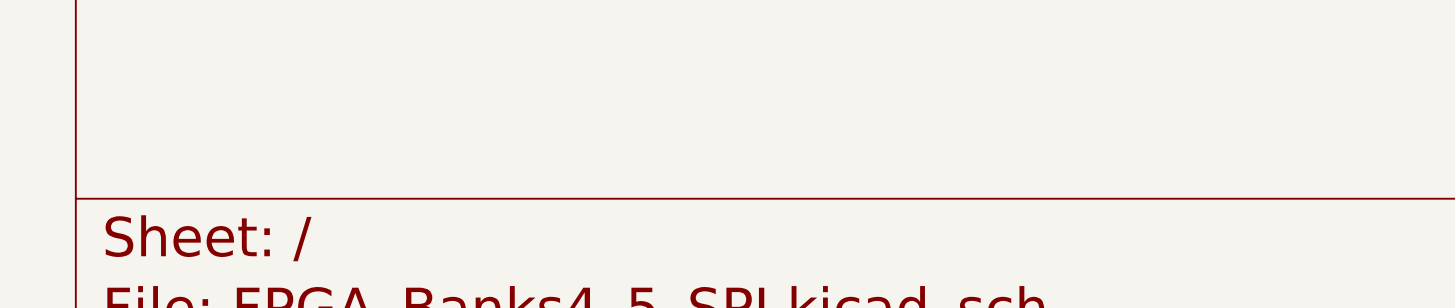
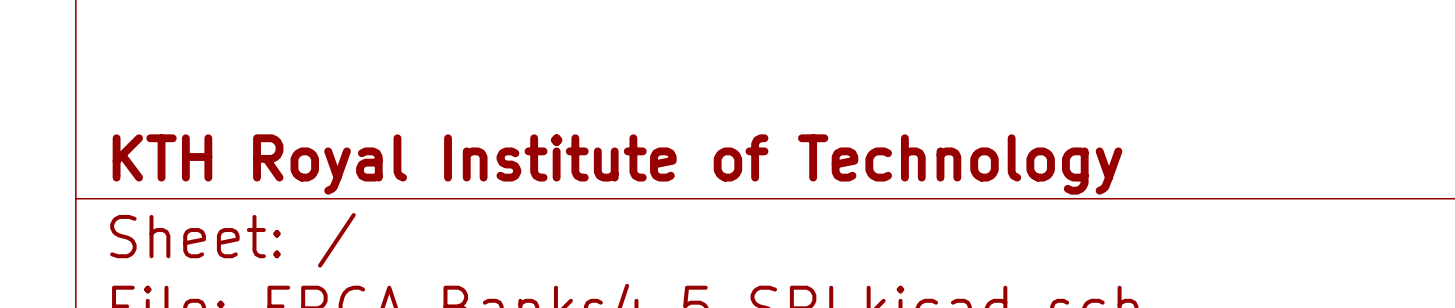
title block: none -> KTH Royal Institute of Technology (617, 164)

